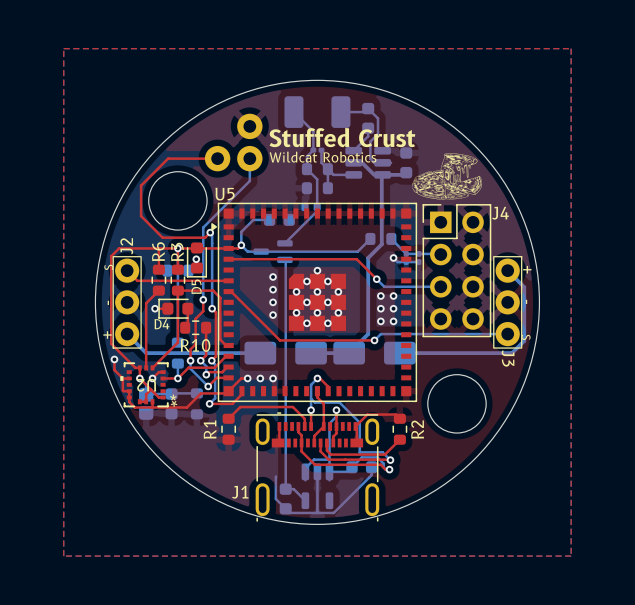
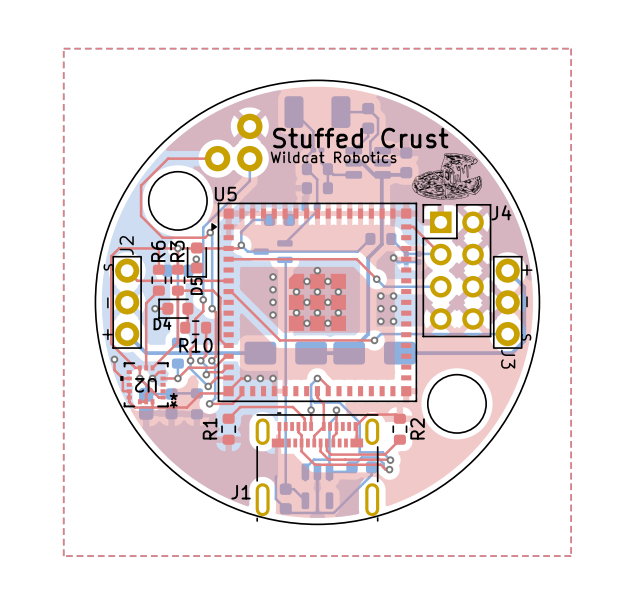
top track: none -> (406, 226) (413, 226) (440, 254)

